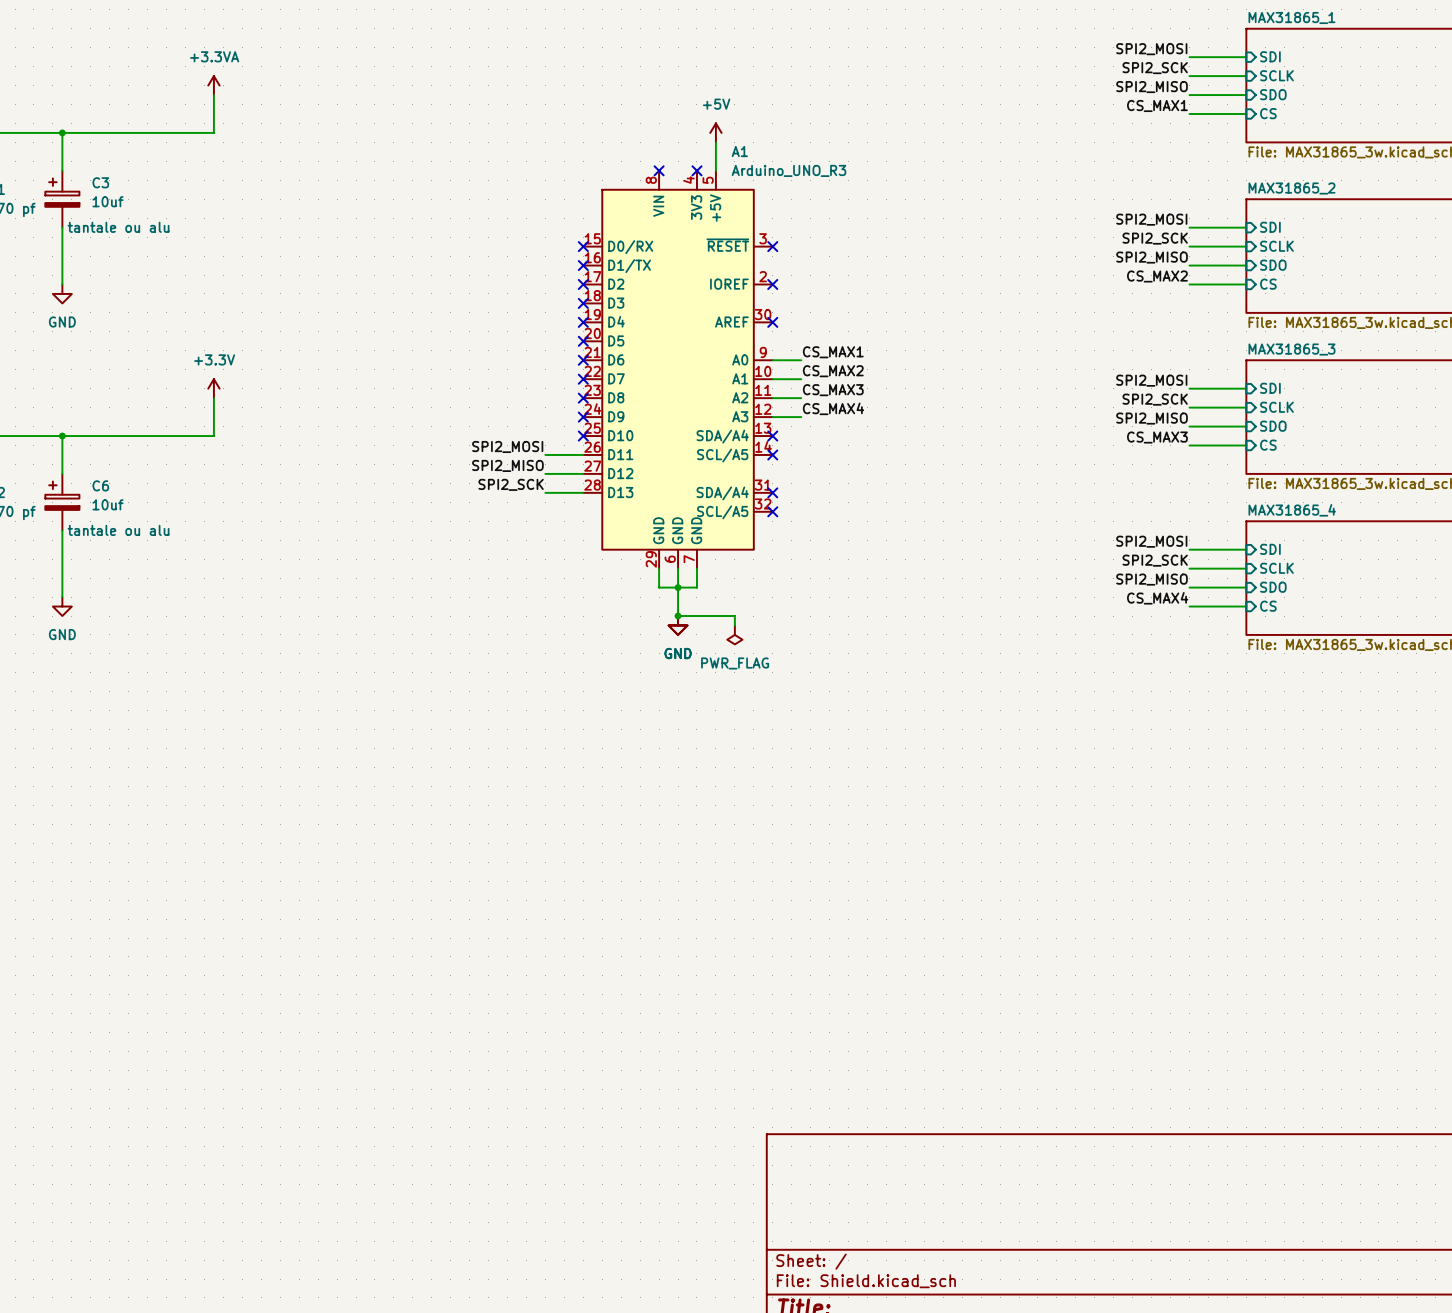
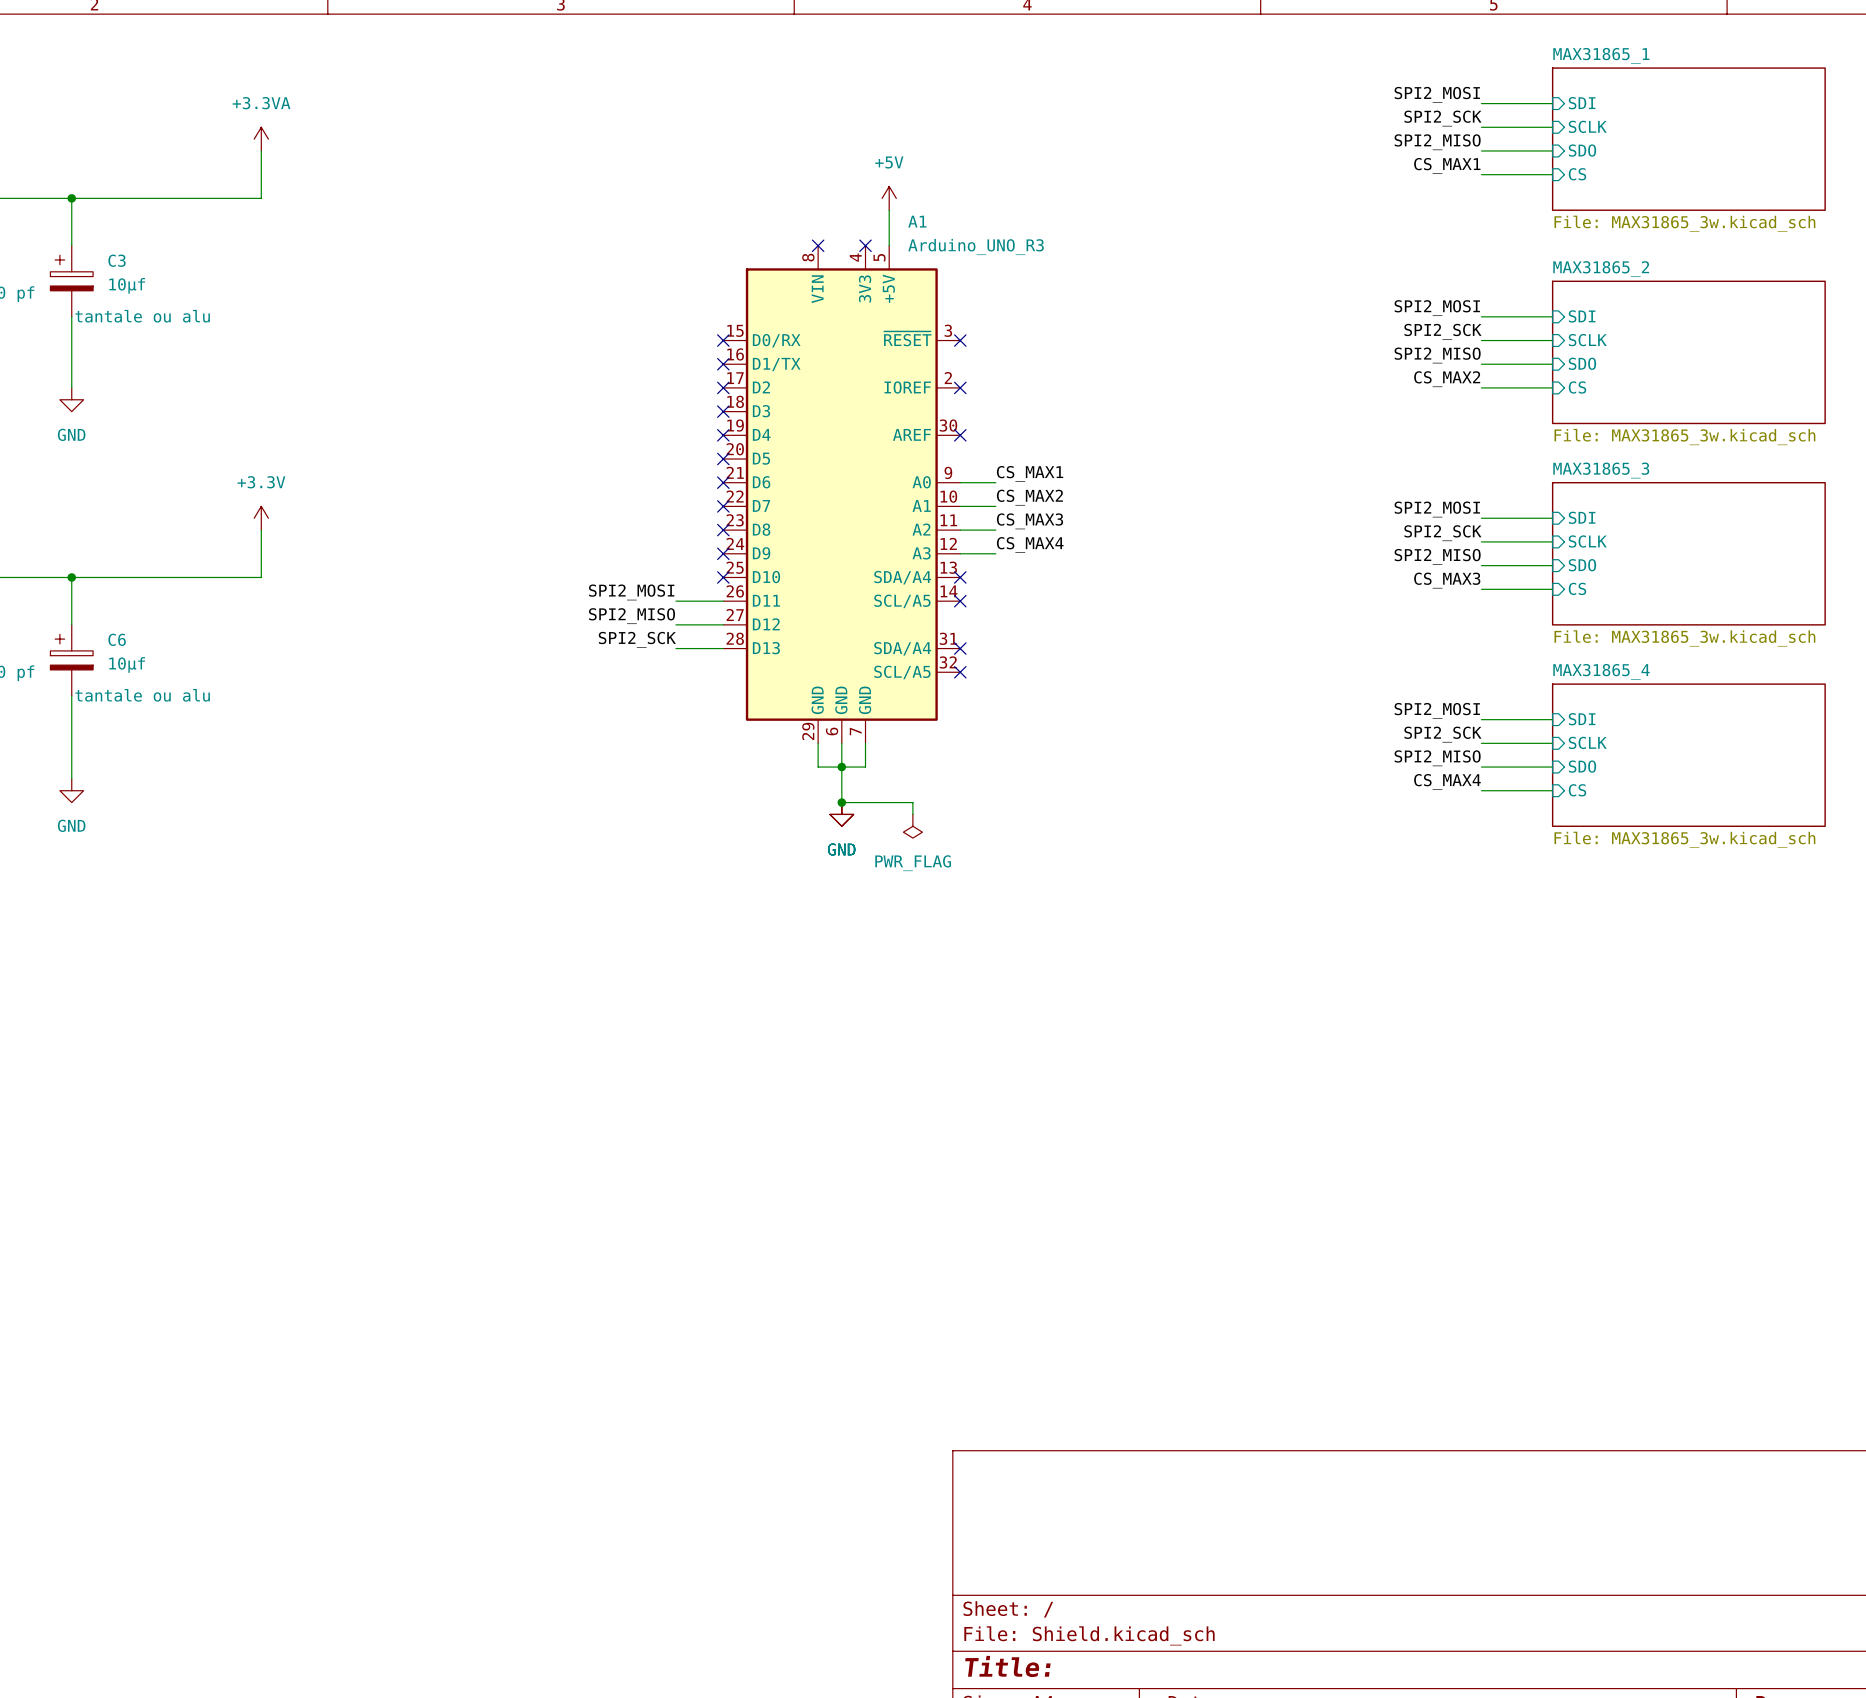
C3 value: 10uf (108, 201) -> 10µf (127, 285)
C6 value: 10uf (108, 504) -> 10µf (127, 664)

